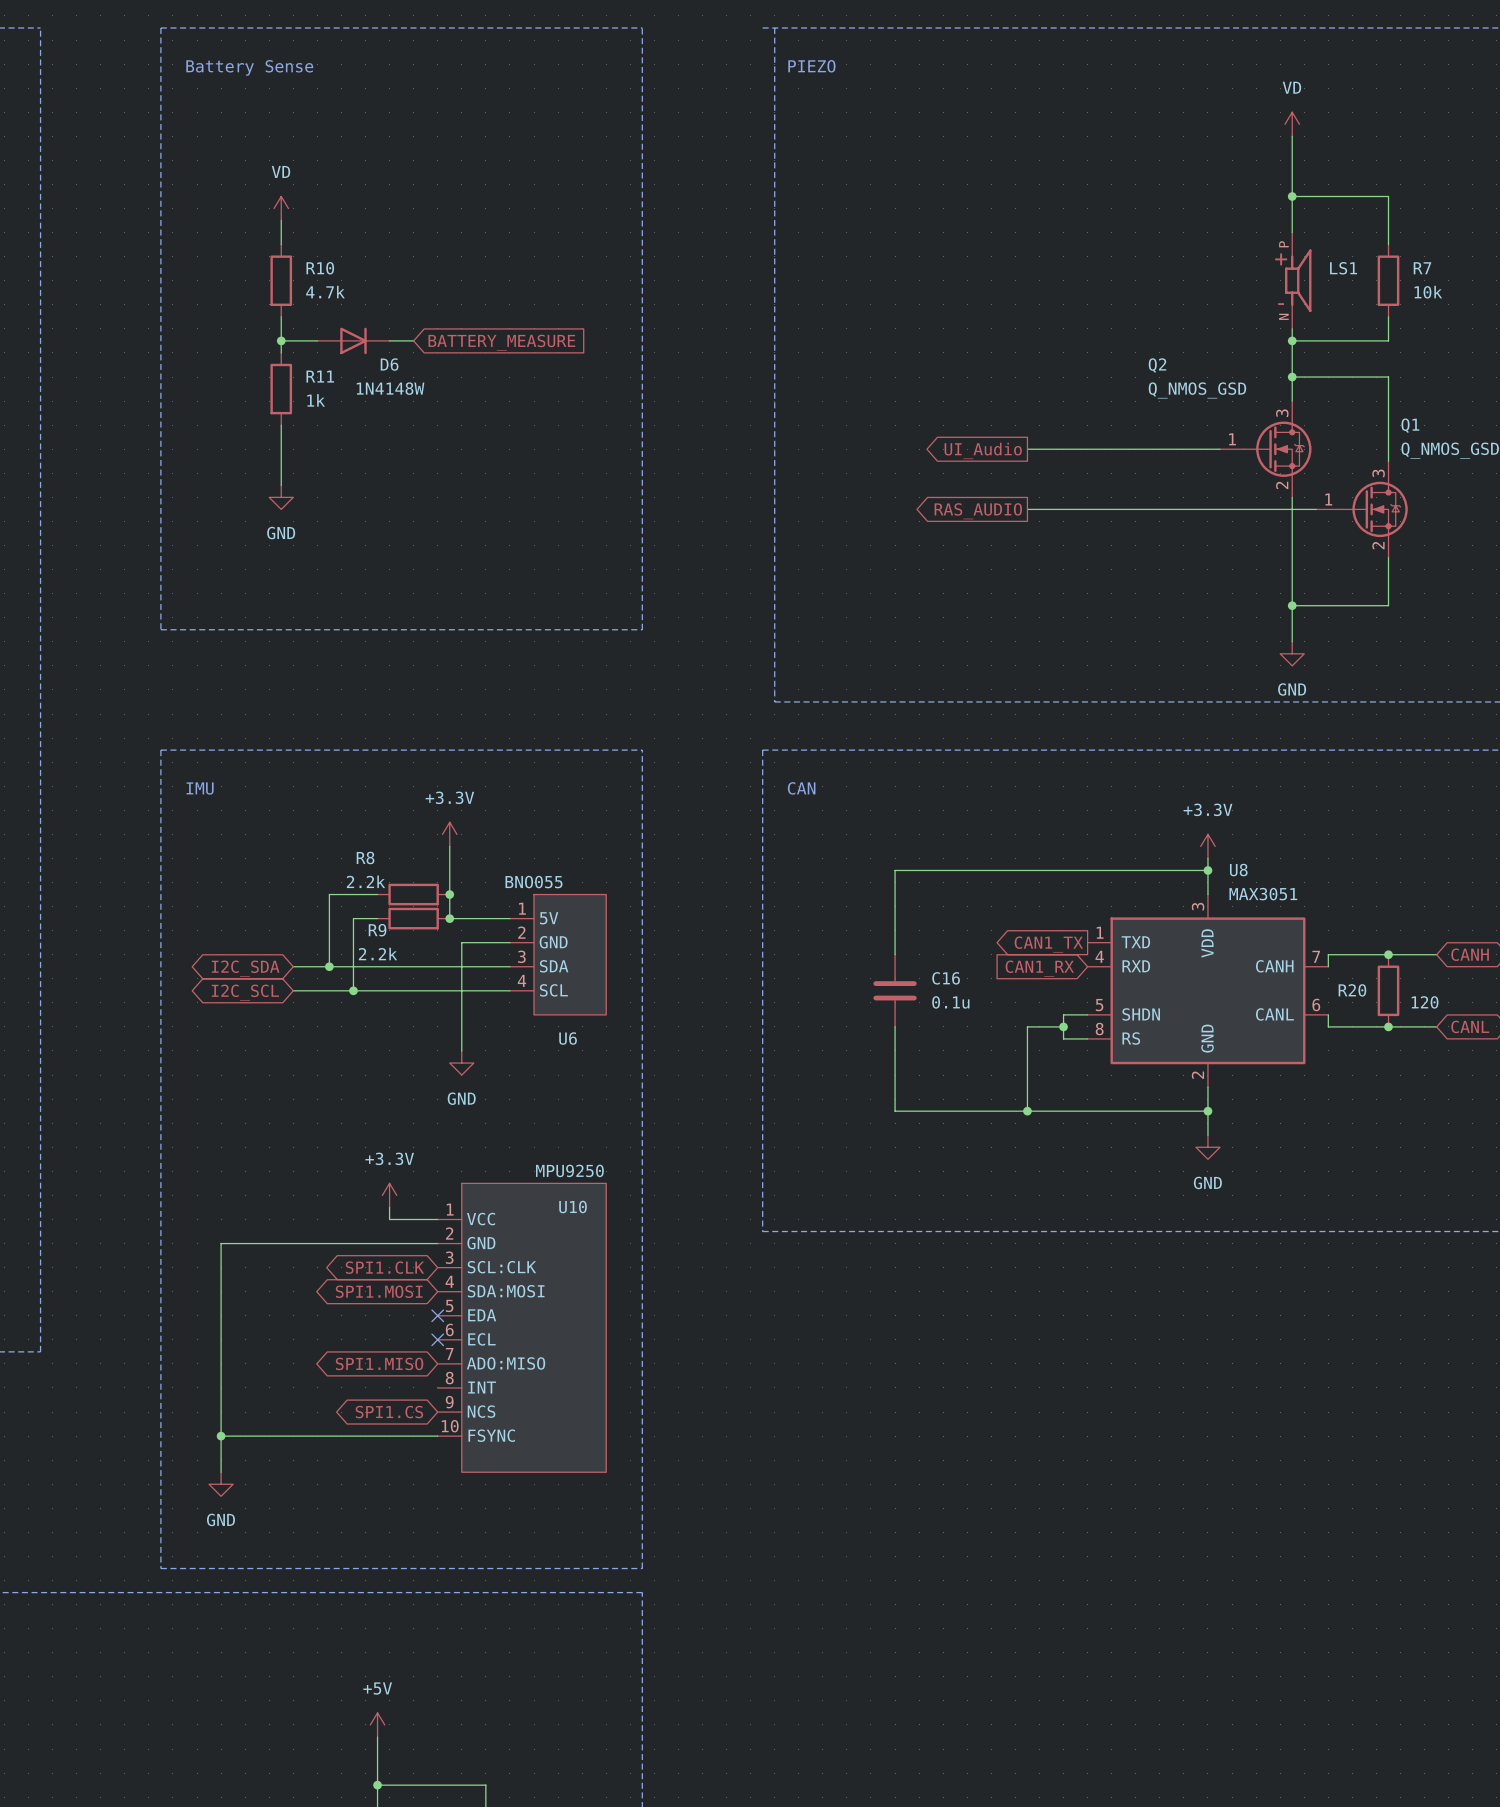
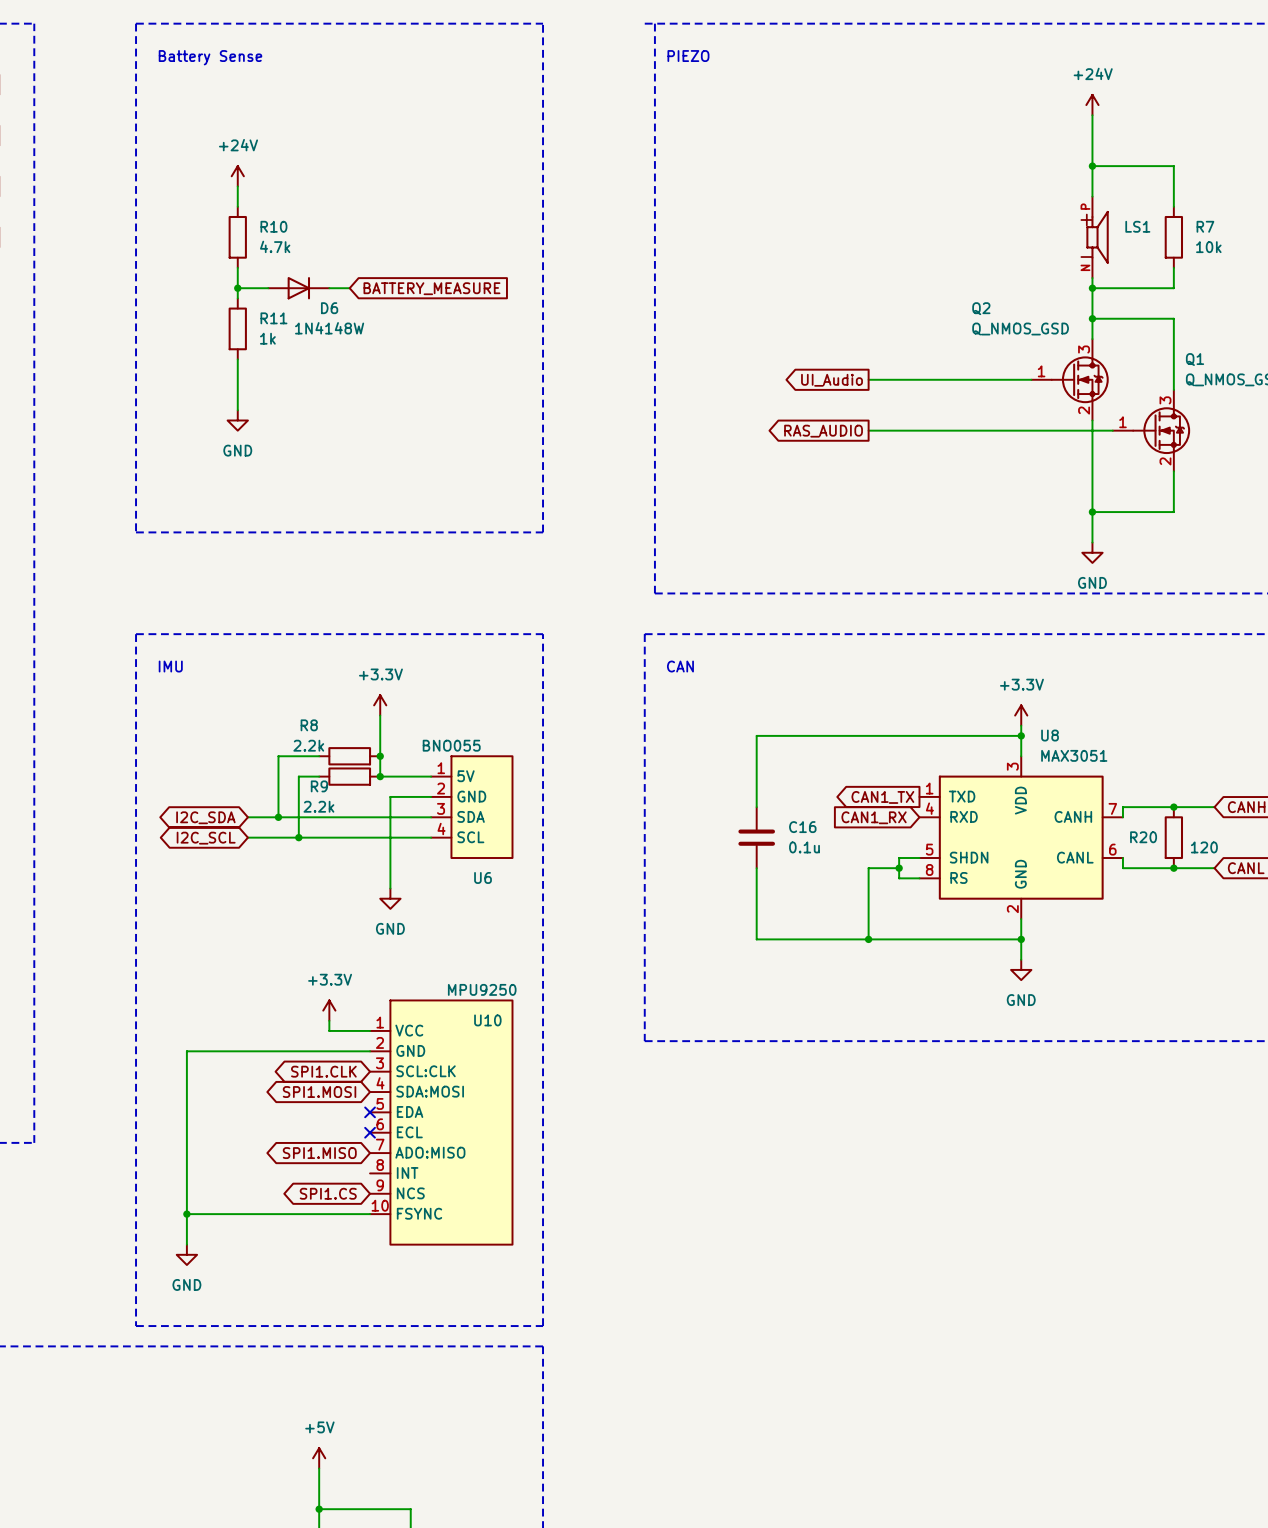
power symbol: VD (1292, 124) -> +24V (1092, 105)
power symbol: VD (281, 208) -> +24V (237, 176)

